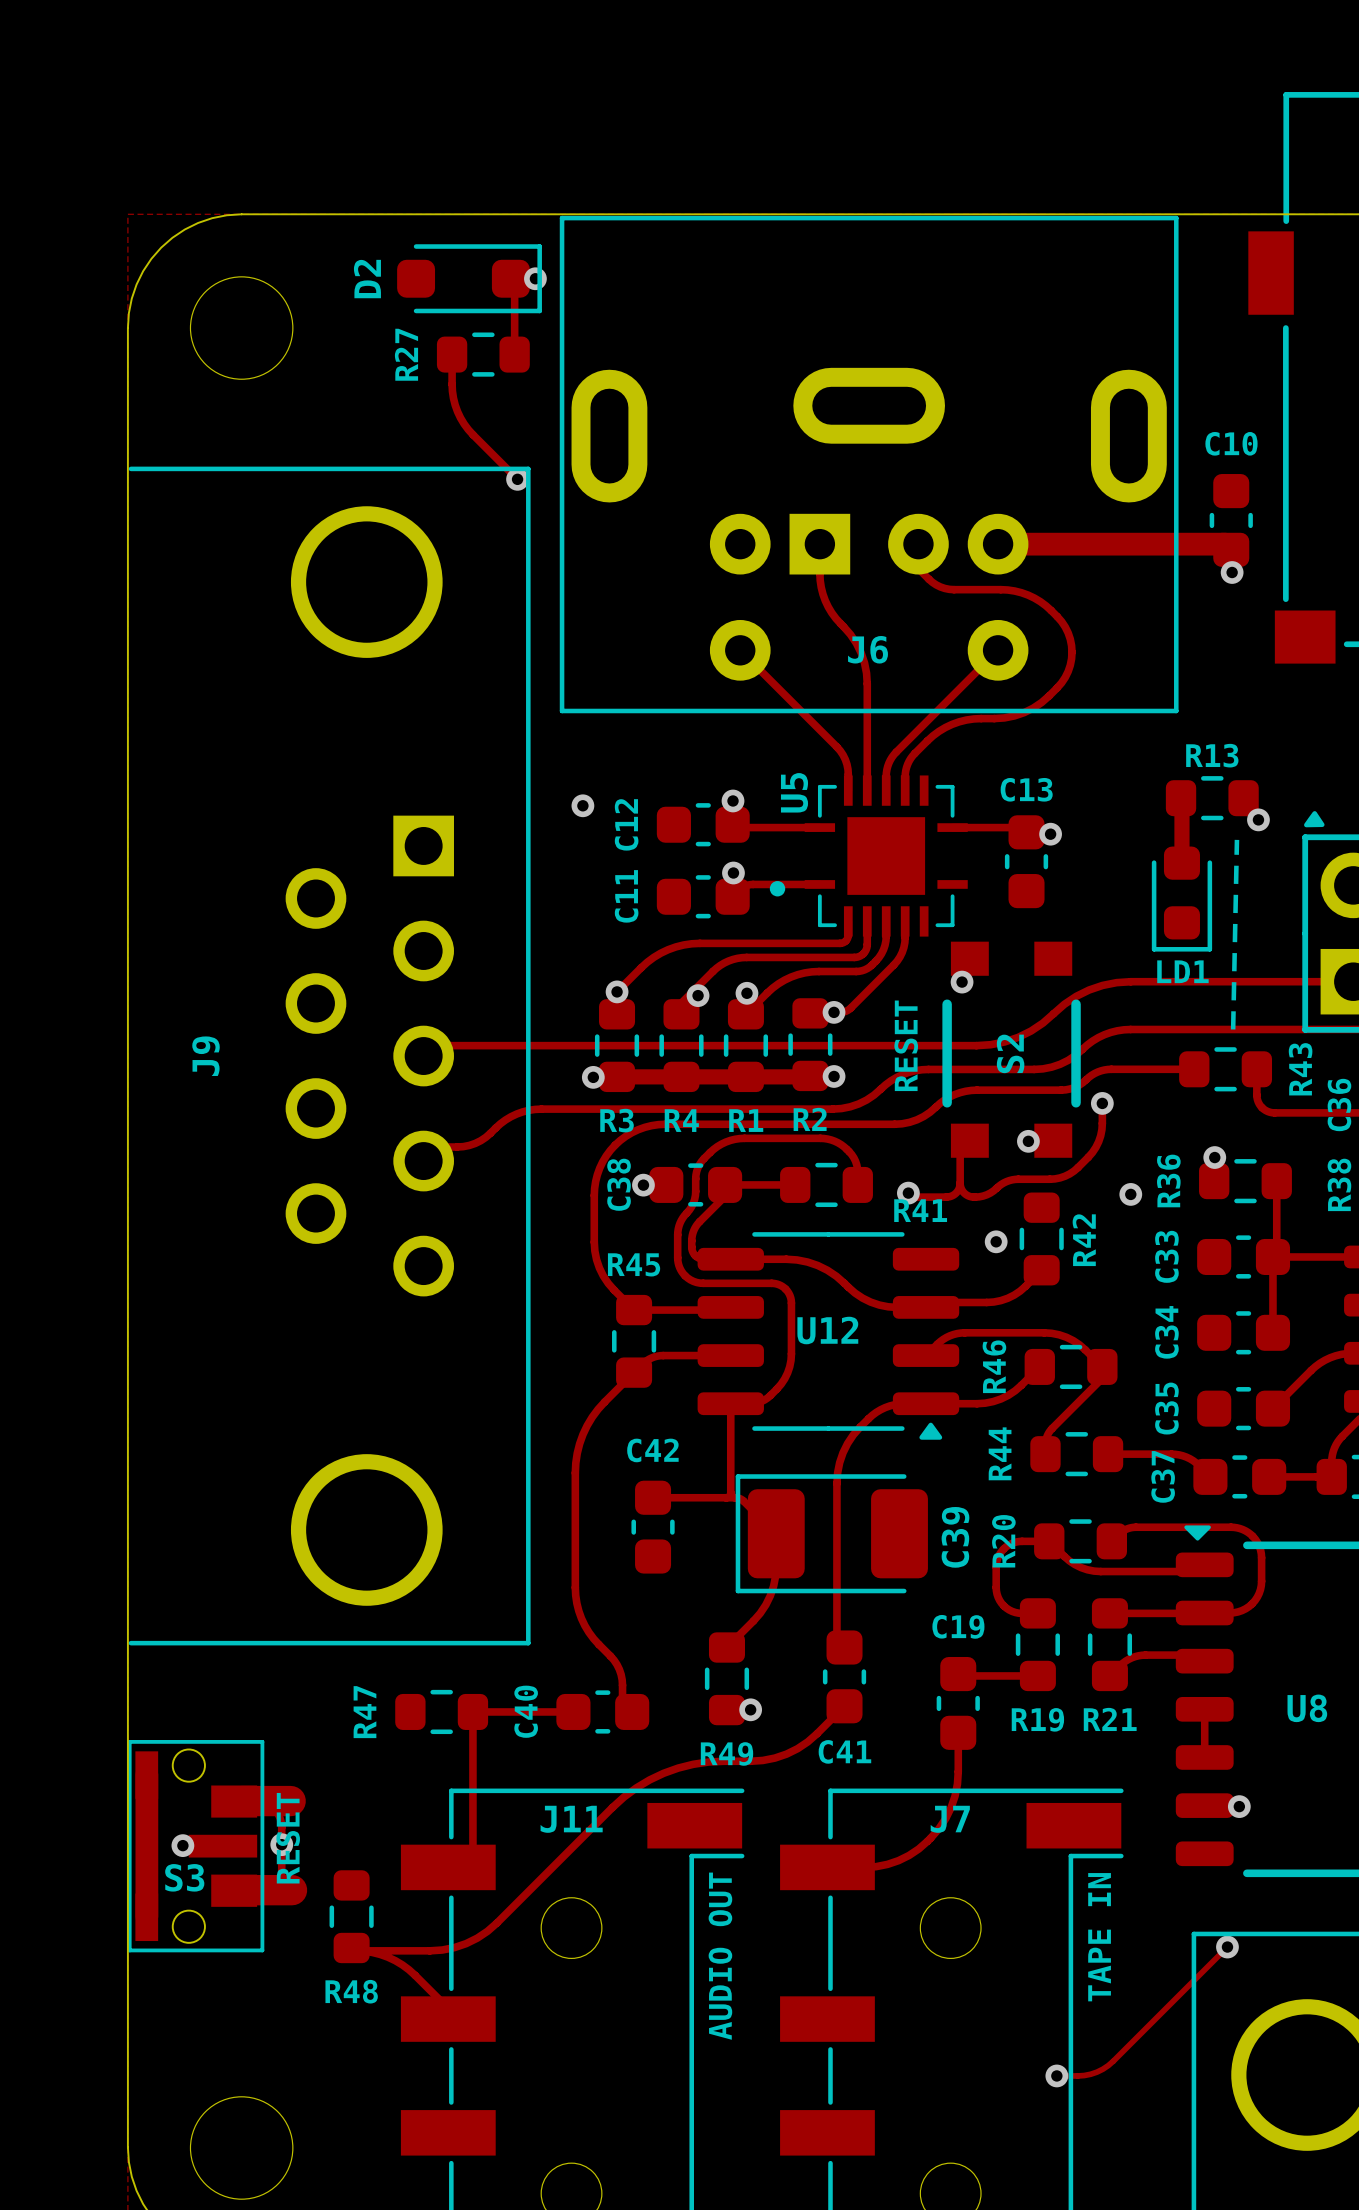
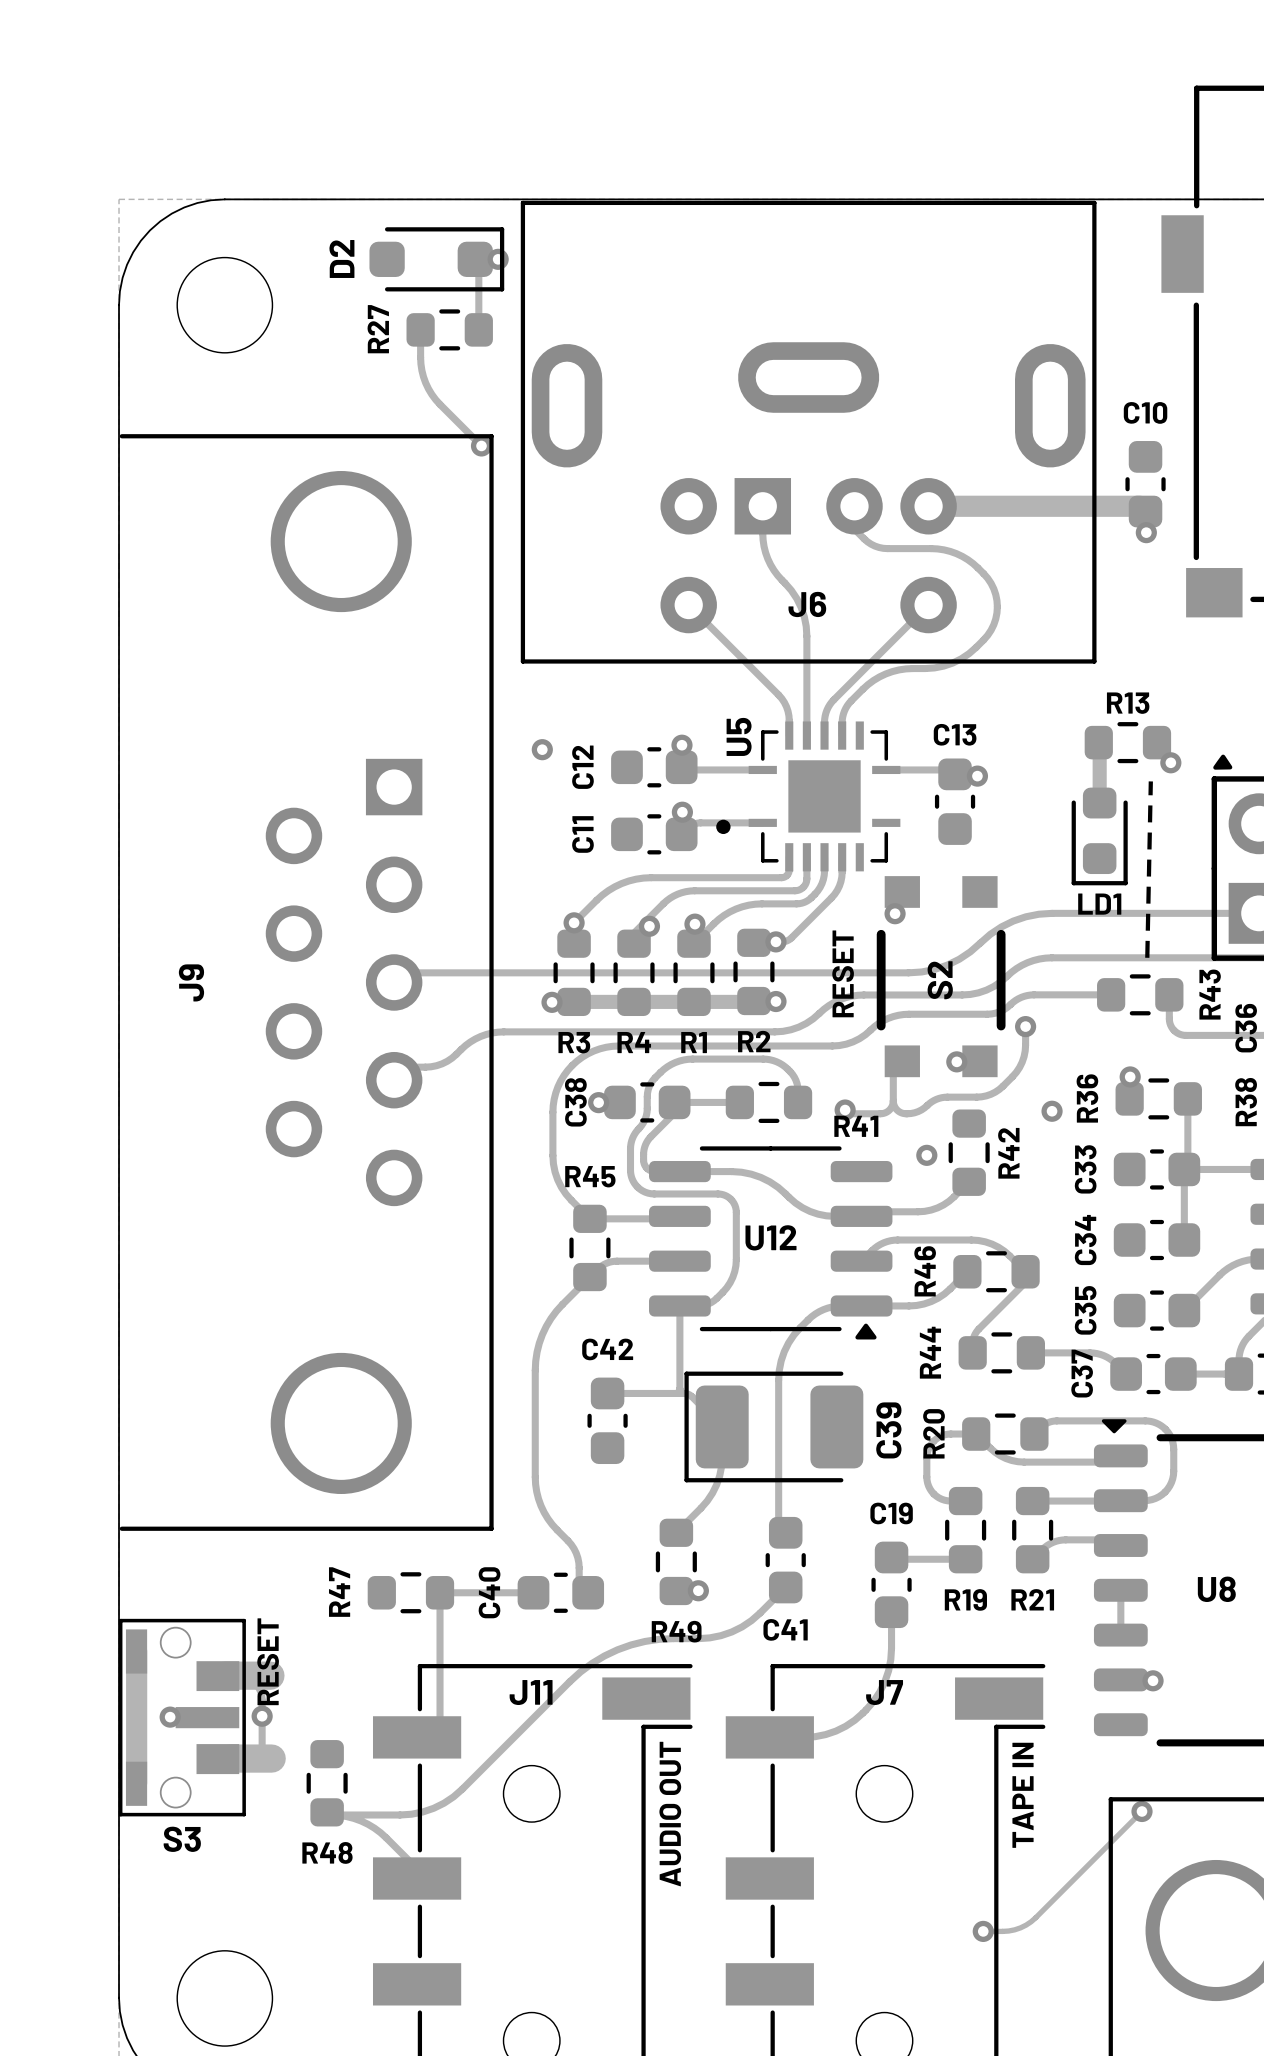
text position: RESET (288, 1838) -> RESET (268, 1661)
S3 name position: S3 (184, 1877) -> S3 (182, 1839)

